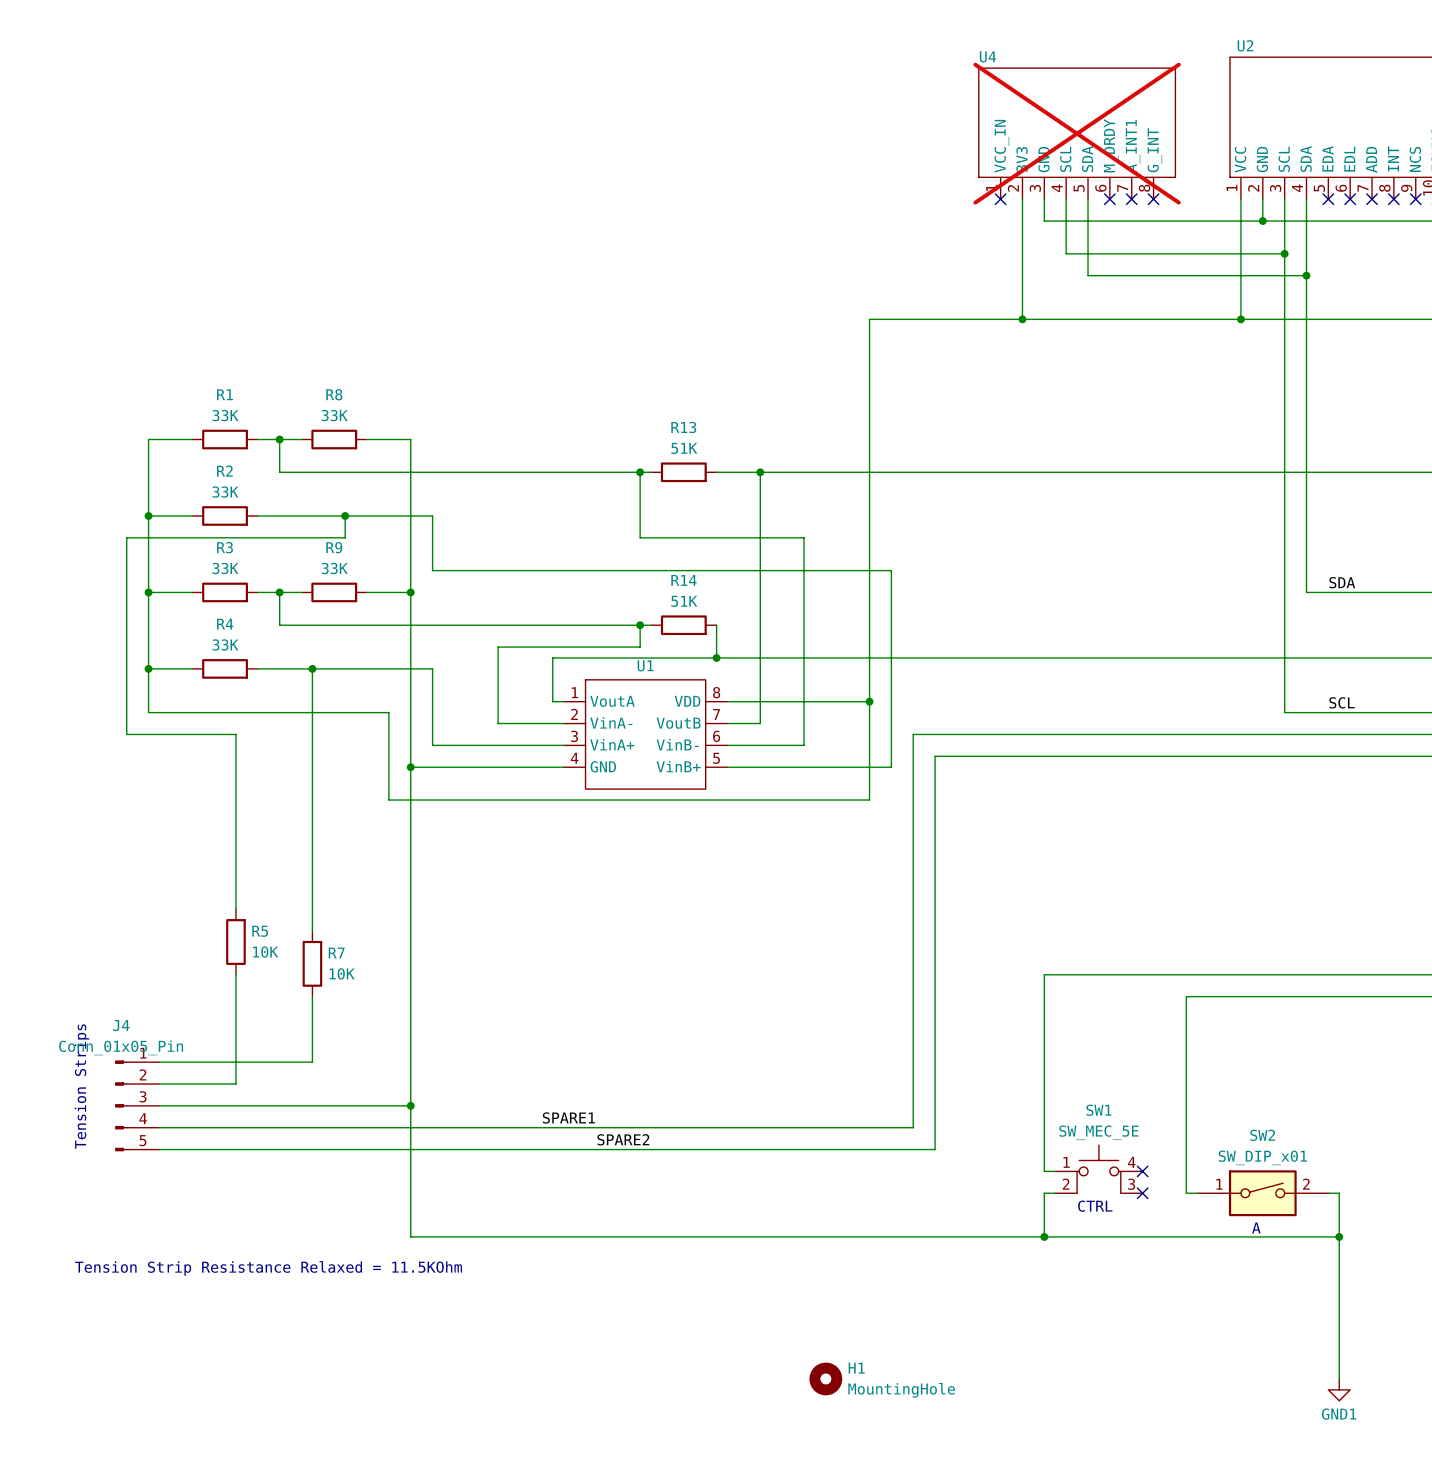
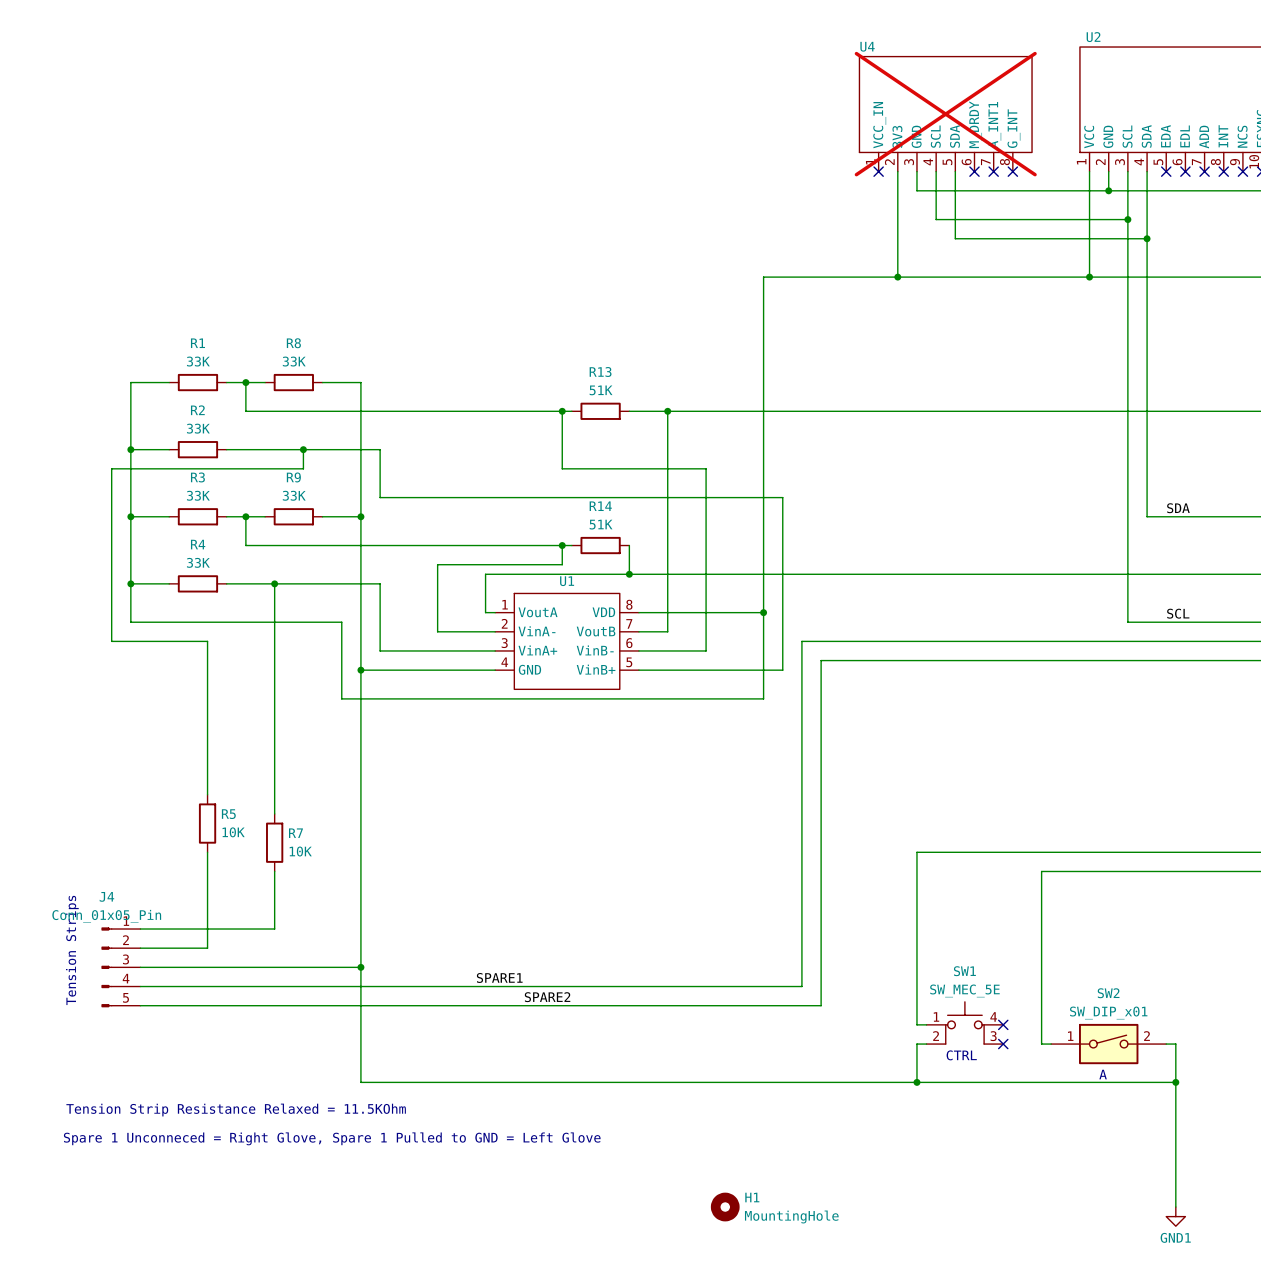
text: none -> Spare 1 Unconneced = Right Glove, Spare 1 Pulled to GND = Left Glove (332, 1138)

